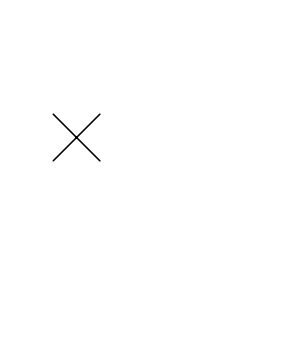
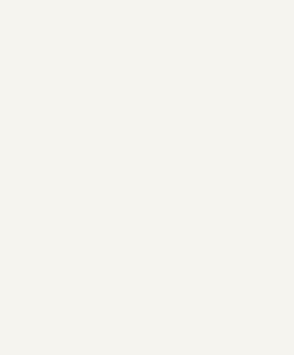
no-connect mark: (76, 137) -> none

